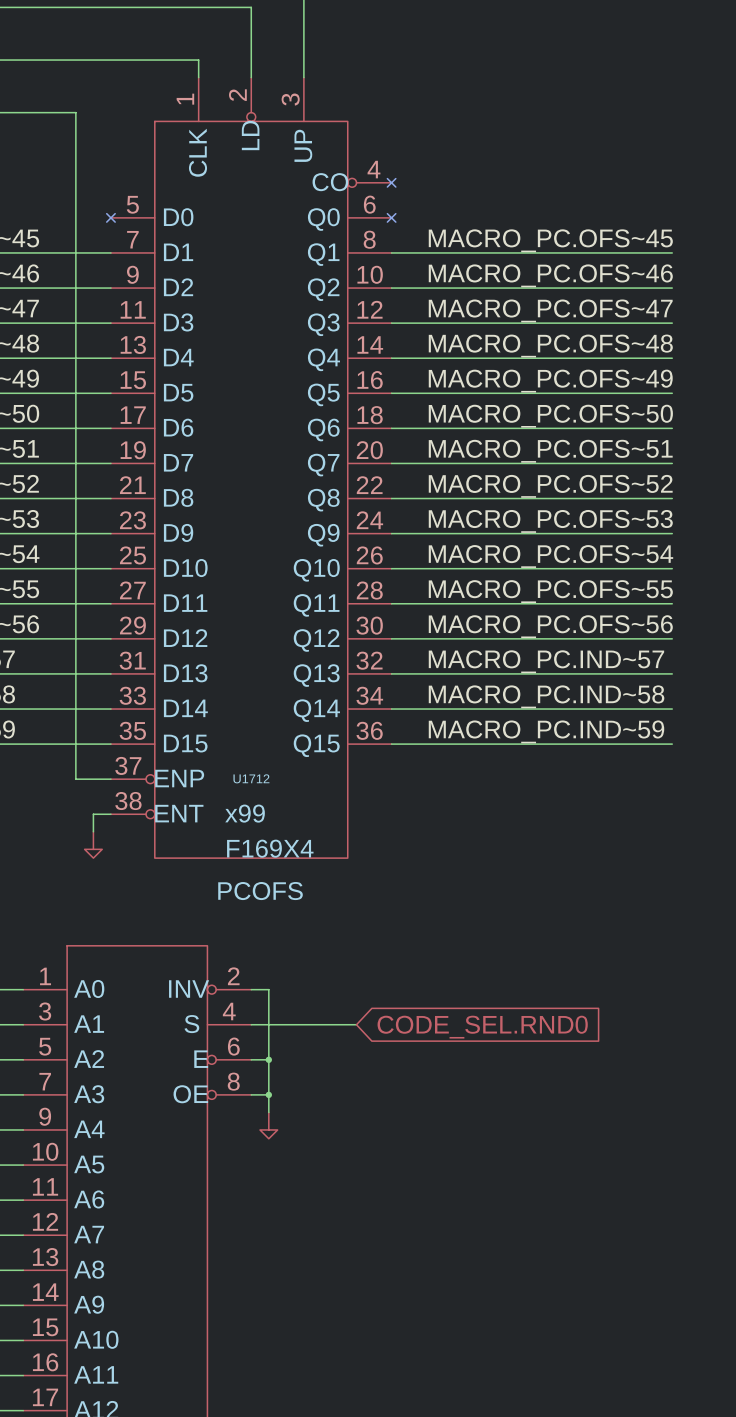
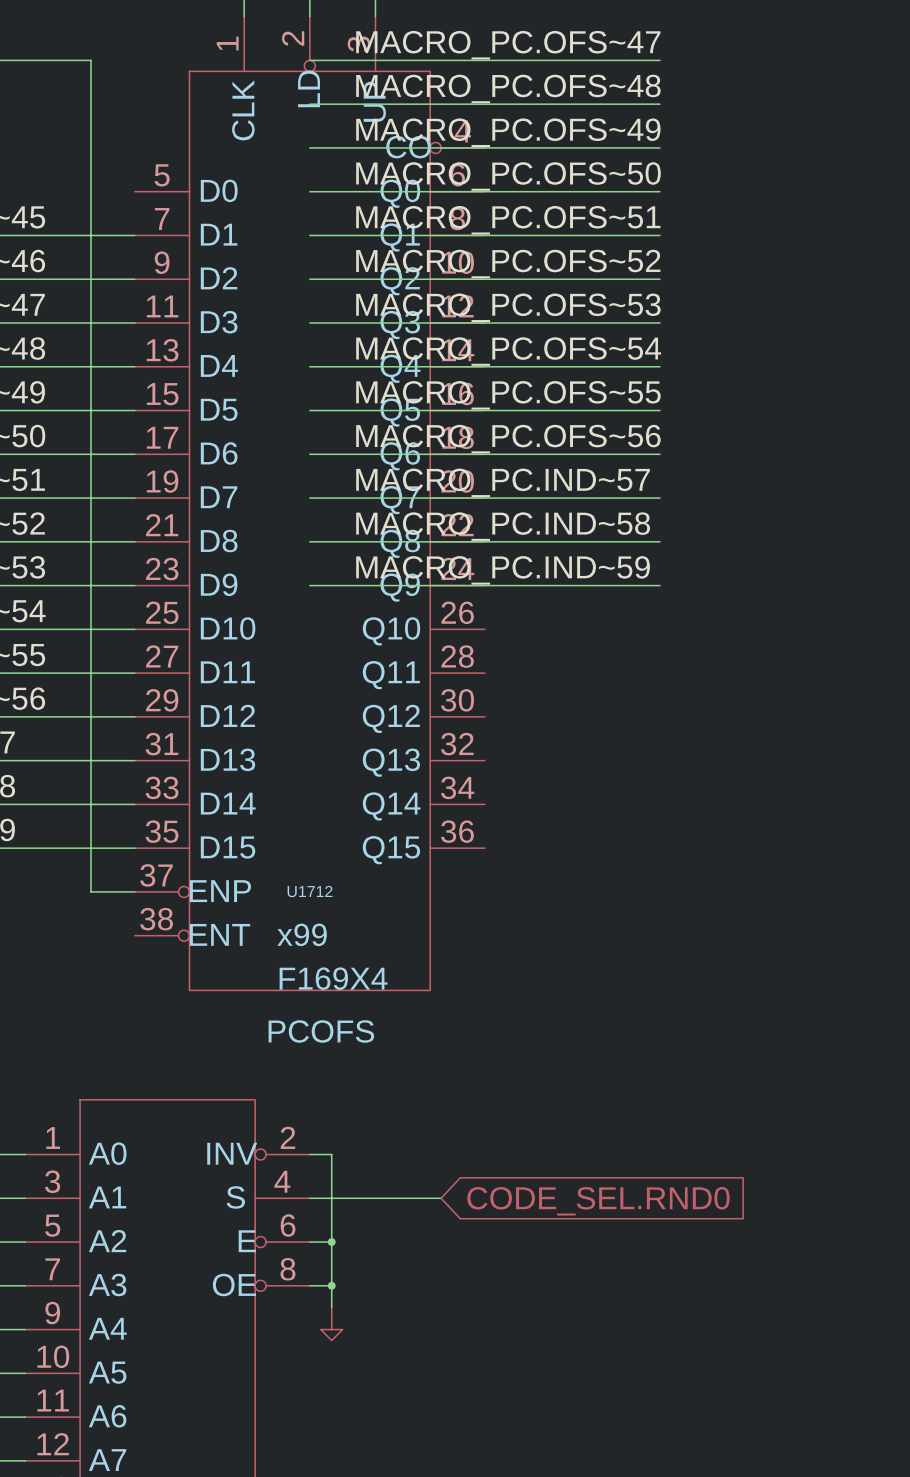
label: none -> MACRO_PC.OFS~47 (508, 45)
wire: none -> (309, 60) (659, 60)
label: none -> MACRO_PC.OFS~48 (508, 88)
wire: none -> (309, 104) (659, 104)
label: none -> MACRO_PC.OFS~49 (508, 132)
wire: none -> (309, 147) (659, 147)
no-connect mark: (391, 182) -> none
label: none -> MACRO_PC.OFS~50 (508, 176)
no-connect mark: (110, 217) -> none
wire: none -> (309, 191) (659, 191)
no-connect mark: (391, 217) -> none
label: none -> MACRO_PC.OFS~51 (508, 220)
label: MACRO_PC.OFS~45 (550, 240) -> none
wire: none -> (309, 235) (484, 235)
wire: (531, 252) (672, 252) -> none
label: none -> MACRO_PC.OFS~52 (508, 264)
label: MACRO_PC.OFS~46 (550, 275) -> none
wire: none -> (309, 279) (484, 279)
wire: (531, 288) (672, 288) -> none
label: none -> MACRO_PC.OFS~53 (508, 307)
label: MACRO_PC.OFS~47 (550, 310) -> none
wire: none -> (309, 323) (484, 323)
wire: (531, 323) (672, 323) -> none
label: none -> MACRO_PC.OFS~54 (508, 351)
label: MACRO_PC.OFS~48 (550, 346) -> none
wire: none -> (309, 366) (484, 366)
wire: (531, 358) (672, 358) -> none
label: none -> MACRO_PC.OFS~55 (508, 395)
label: MACRO_PC.OFS~49 (550, 381) -> none
wire: none -> (309, 410) (484, 410)
wire: (531, 393) (672, 393) -> none
label: none -> MACRO_PC.OFS~56 (508, 439)
label: MACRO_PC.OFS~50 (550, 416) -> none
wire: none -> (309, 454) (484, 454)
wire: (531, 428) (672, 428) -> none
label: none -> MACRO_PC.IND~57 (503, 482)
label: MACRO_PC.OFS~51 (550, 451) -> none
wire: none -> (309, 498) (484, 498)
wire: (531, 463) (672, 463) -> none
label: none -> MACRO_PC.IND~58 (503, 526)
label: MACRO_PC.OFS~52 (550, 486) -> none
wire: none -> (309, 541) (484, 541)
wire: (531, 498) (672, 498) -> none
label: none -> MACRO_PC.IND~59 (503, 570)
label: MACRO_PC.OFS~53 (550, 521) -> none
wire: none -> (309, 585) (484, 585)
wire: (531, 533) (672, 533) -> none
label: MACRO_PC.OFS~54 (550, 556) -> none
wire: (391, 568) (672, 568) -> none
label: MACRO_PC.OFS~55 (550, 591) -> none
wire: (391, 603) (672, 603) -> none
label: MACRO_PC.OFS~56 (550, 626) -> none
wire: (391, 638) (672, 638) -> none
label: MACRO_PC.IND~57 (546, 661) -> none
wire: (391, 673) (672, 673) -> none
label: MACRO_PC.IND~58 (546, 696) -> none
wire: (391, 709) (672, 709) -> none
label: MACRO_PC.IND~59 (546, 731) -> none
wire: (391, 744) (672, 744) -> none
wire: (110, 814) (93, 814) (93, 831) -> none
power symbol: (93, 845) -> none

